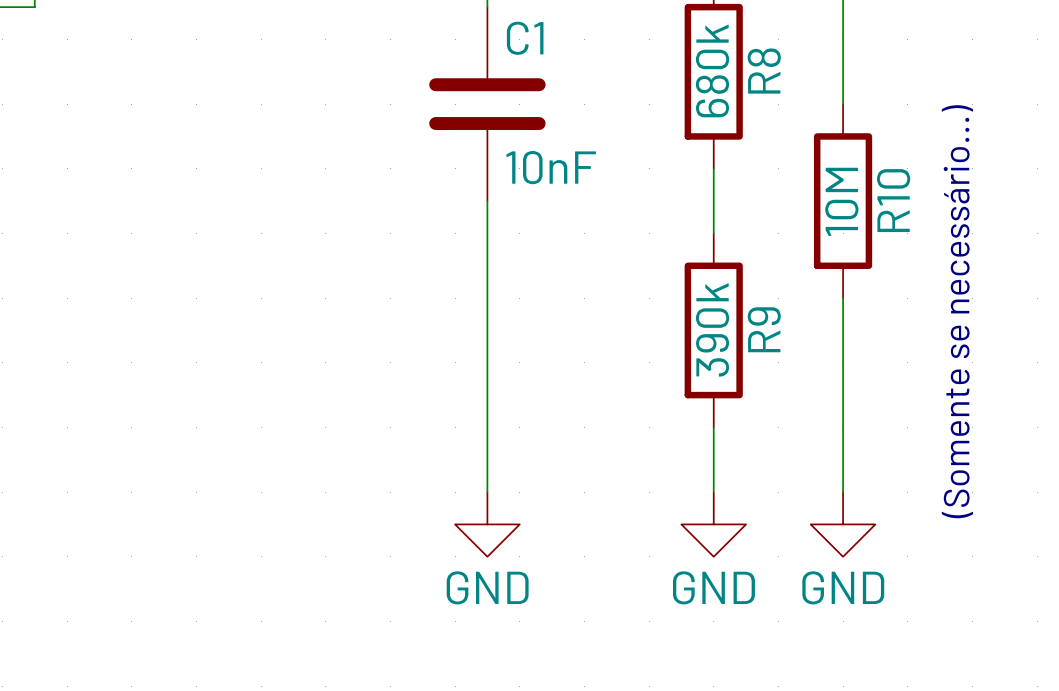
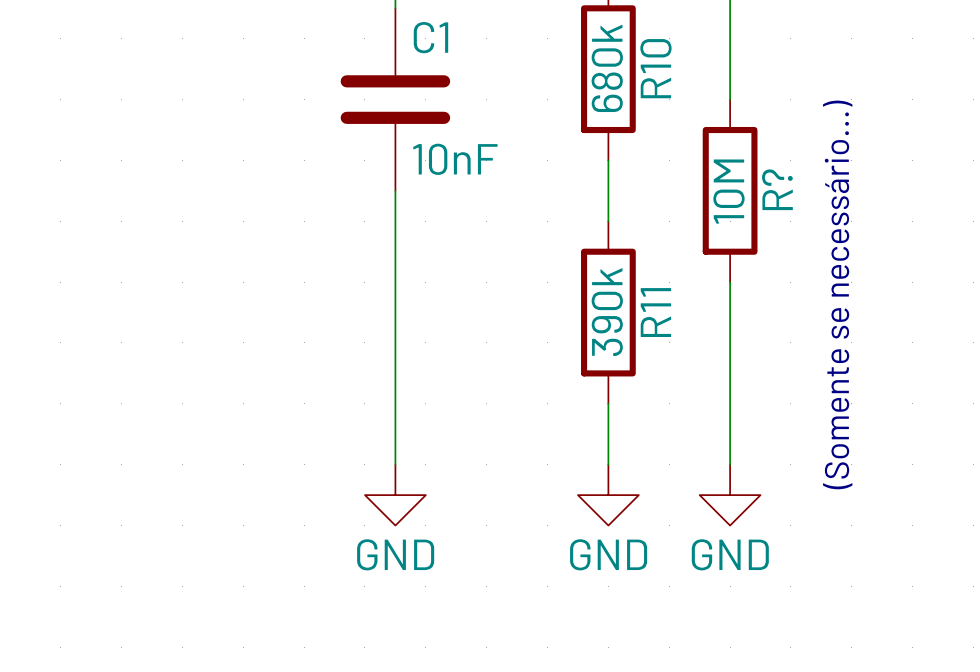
R8 name: R8 (764, 71) -> R10 (655, 68)
R10 name: R10 (893, 200) -> R? (777, 189)
R9 name: R9 (764, 329) -> R11 (655, 312)

